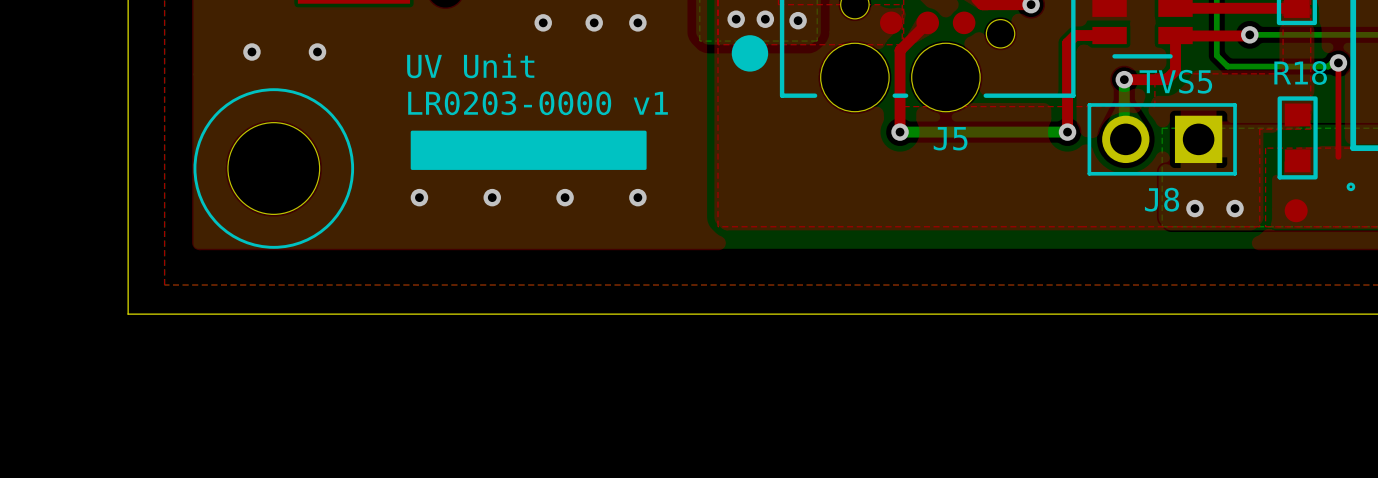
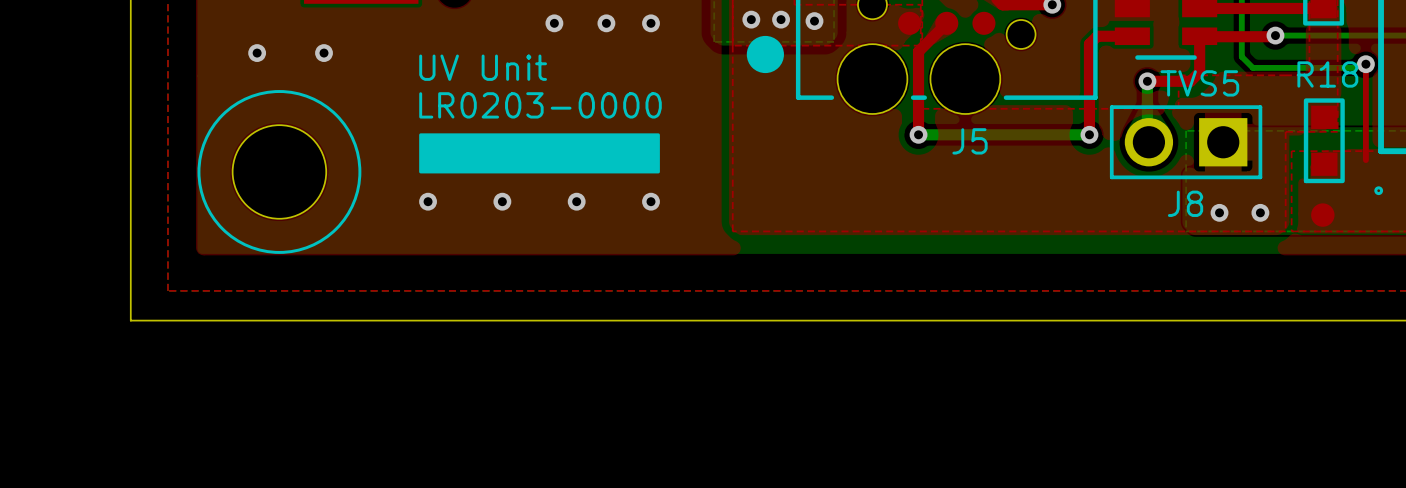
text: LR0203-0000 v1 (538, 103) -> LR0203-0000 (540, 105)

